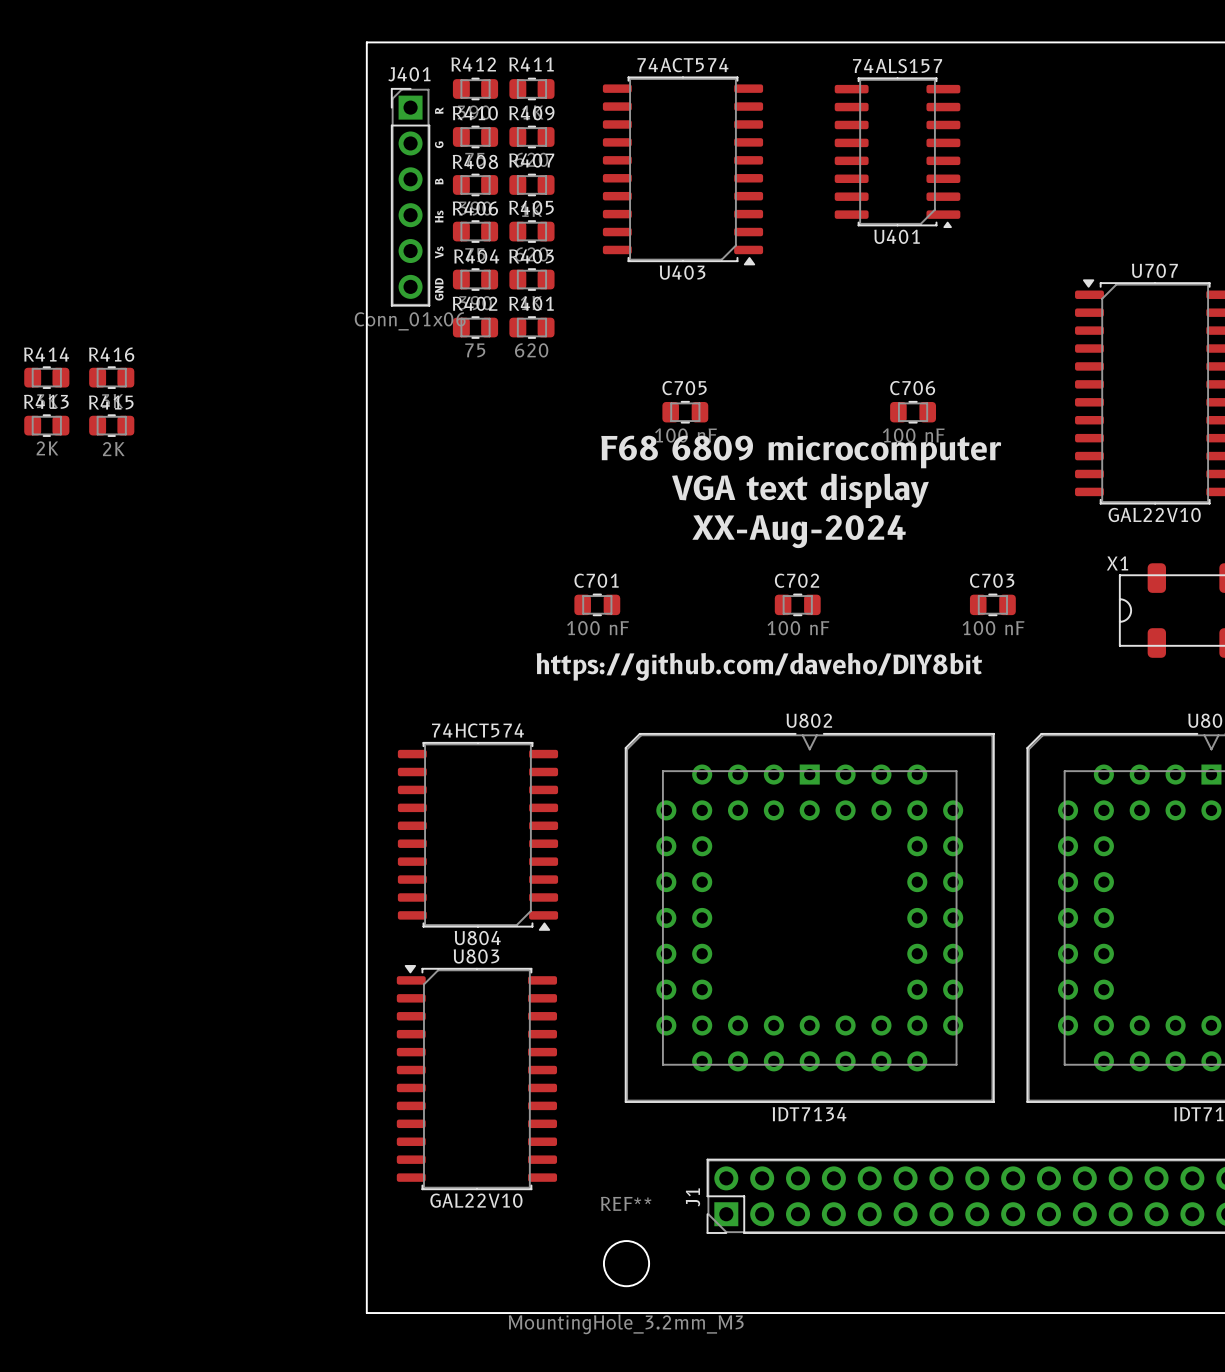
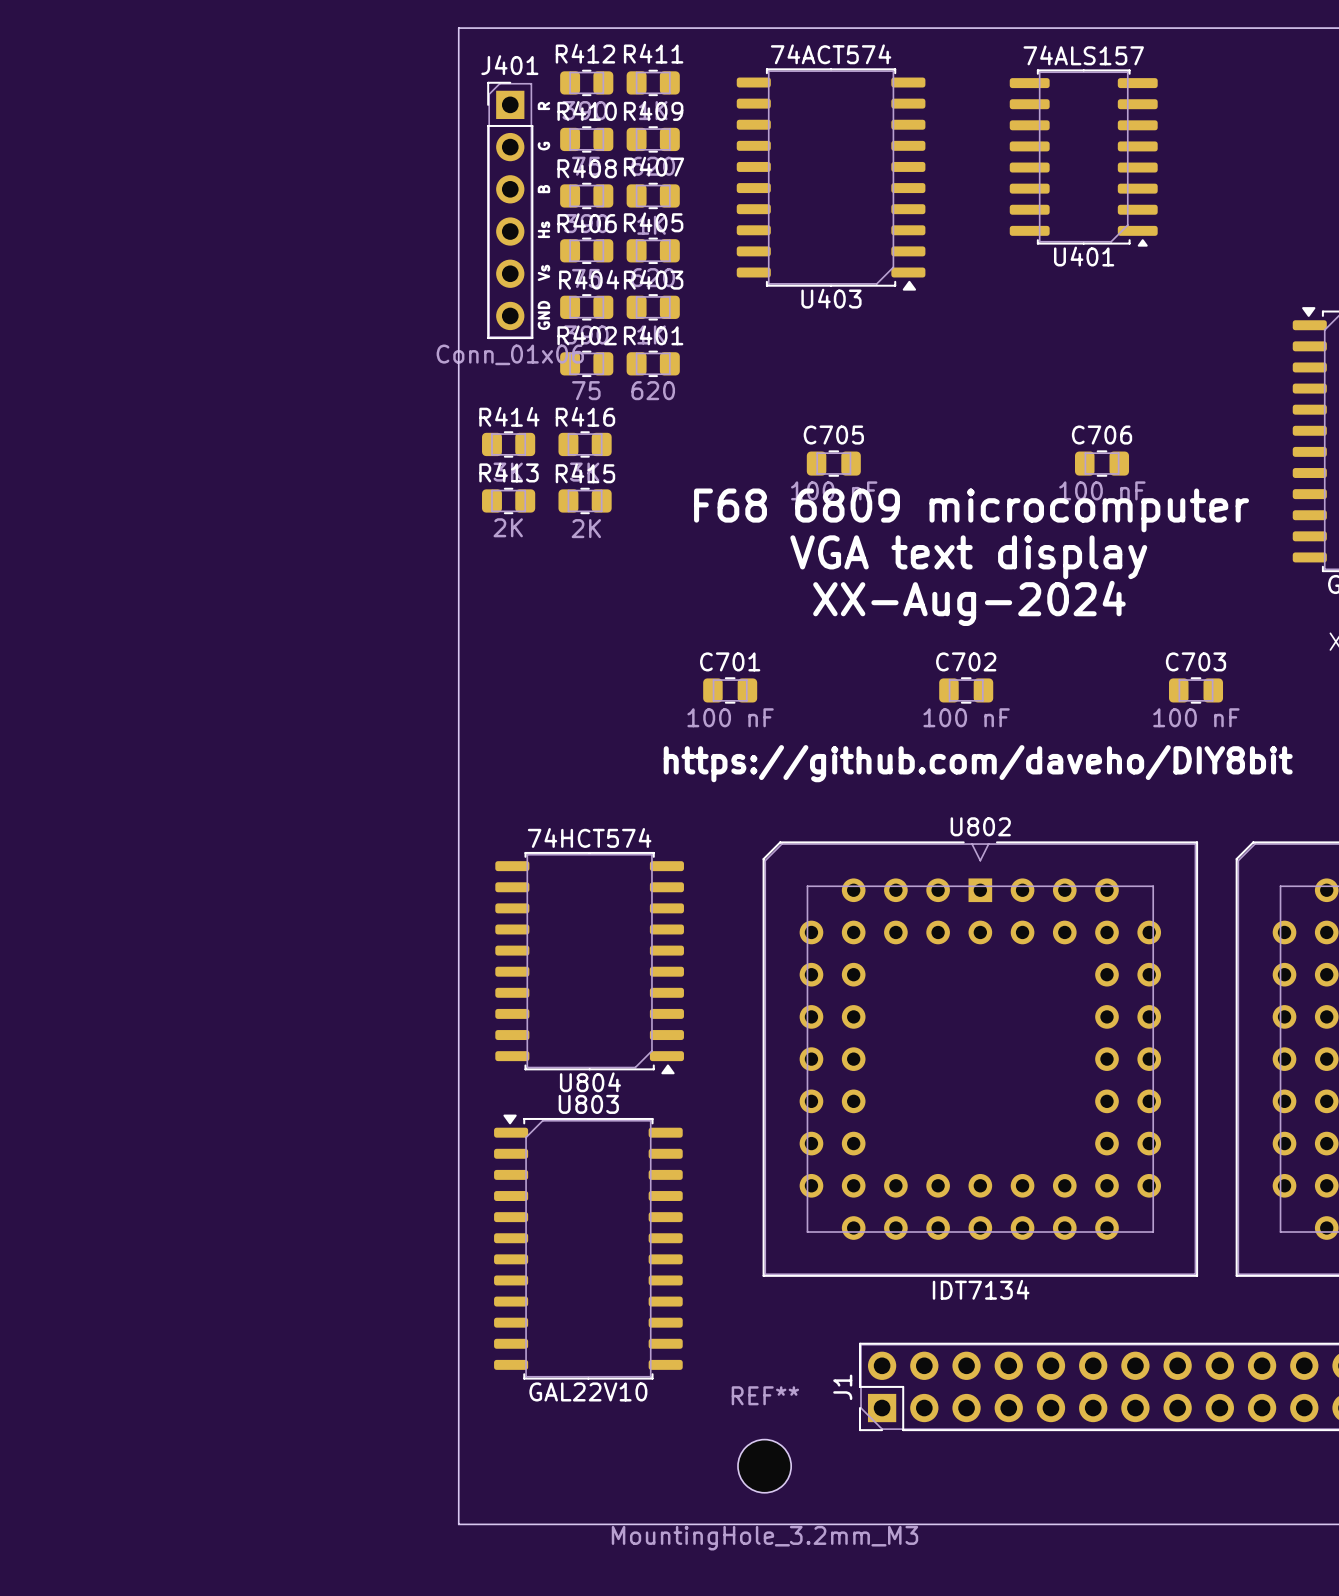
R414 position: (46, 377) -> (508, 444)
R416 position: (111, 377) -> (585, 444)
R413 position: (46, 425) -> (508, 500)
R415 position: (111, 425) -> (585, 500)

